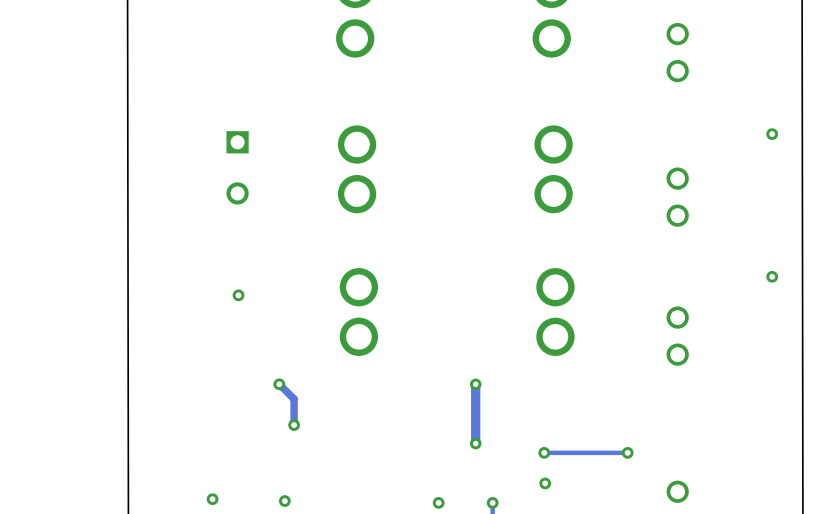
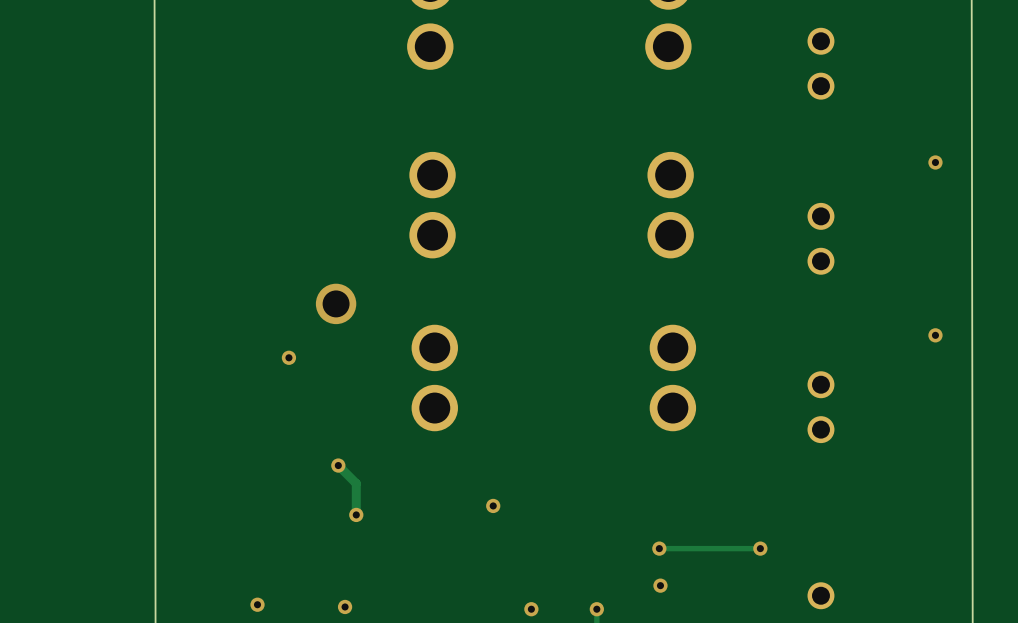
part: (237, 167) -> none
via: none -> (336, 303)
track: (475, 384) (475, 443) -> none
via: (475, 384) -> none
via: none -> (493, 505)
via: (475, 443) -> none

